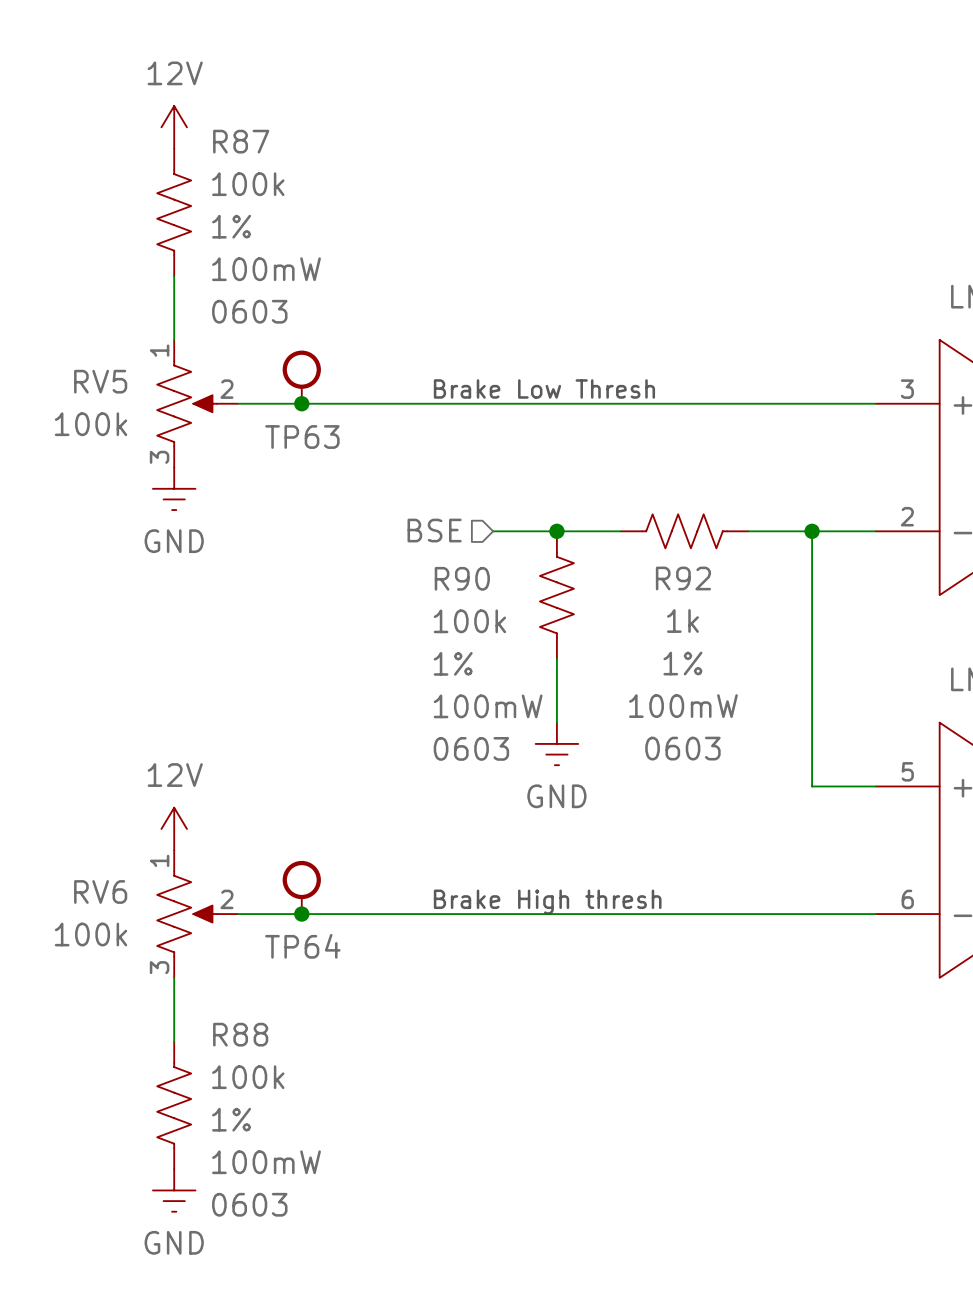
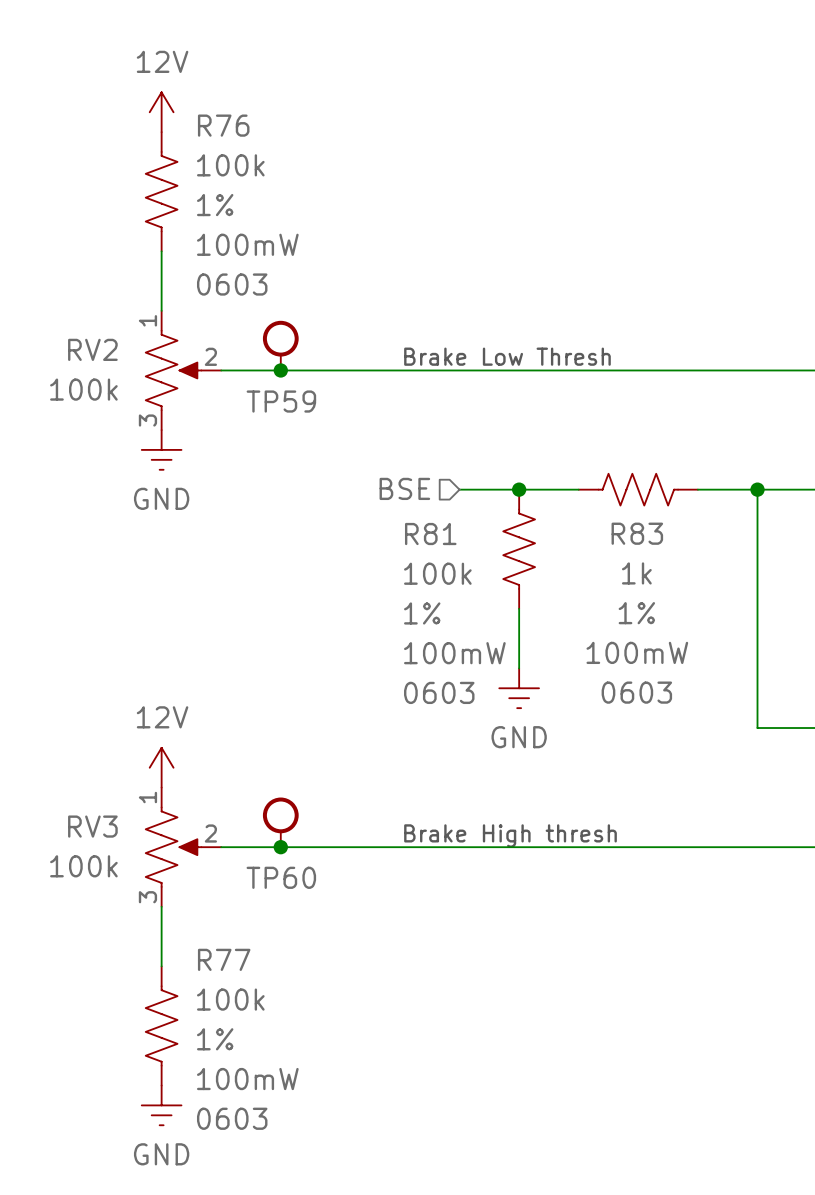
R87 name: R87 (241, 141) -> R76 (223, 125)
RV5 name: RV5 (100, 381) -> RV2 (92, 349)
TP63 name: TP63 (302, 437) -> TP59 (281, 401)
R90 name: R90 (462, 578) -> R81 (430, 534)
R92 name: R92 (683, 578) -> R83 (637, 533)
RV6 name: RV6 (100, 891) -> RV3 (92, 826)
TP64 name: TP64 (302, 946) -> TP60 (281, 877)
R88 name: R88 (240, 1034) -> R77 (224, 959)

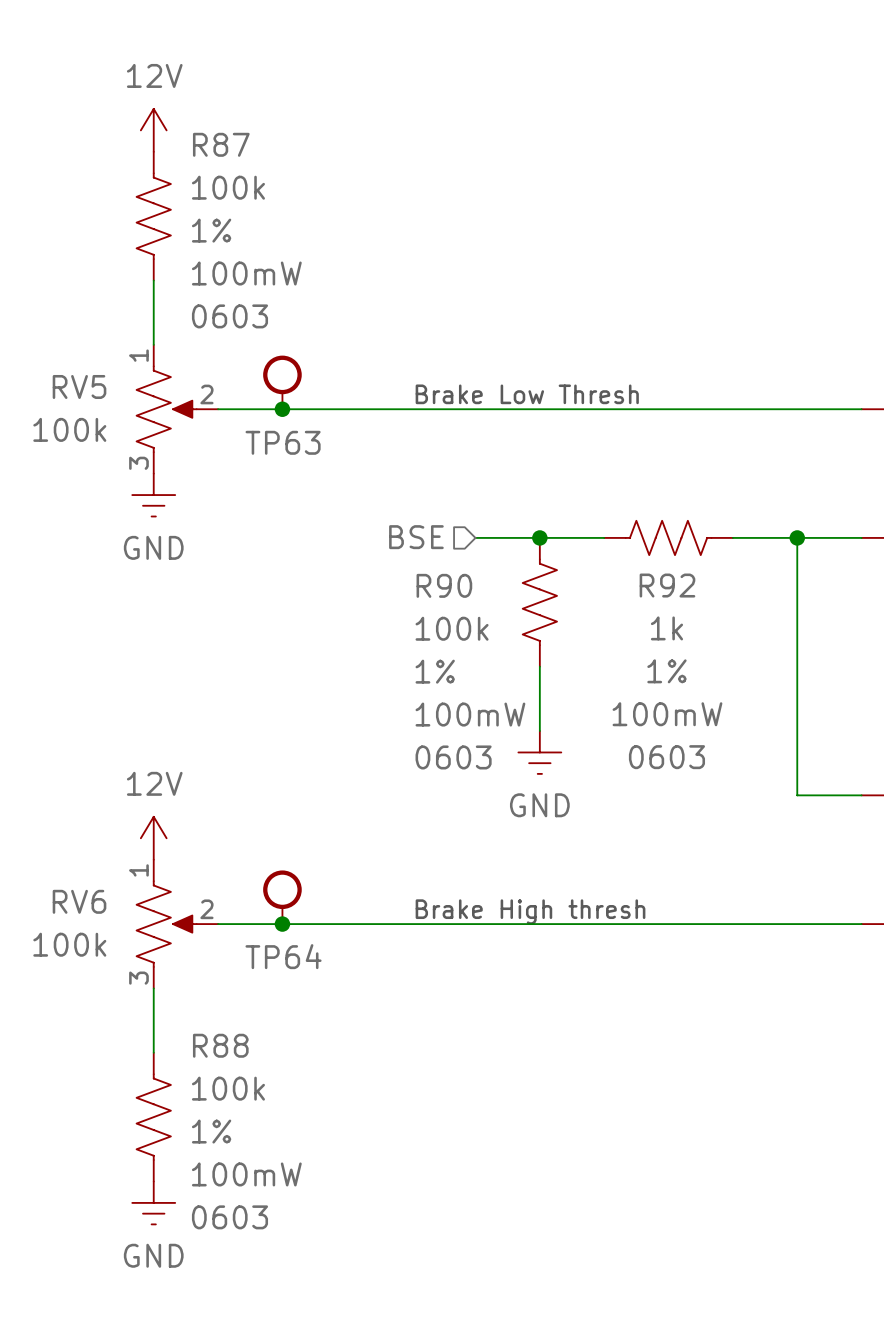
R76 name: R76 (223, 125) -> R87 (221, 144)
RV2 name: RV2 (92, 349) -> RV5 (79, 386)
TP59 name: TP59 (281, 401) -> TP63 (283, 442)
R83 name: R83 (637, 533) -> R92 (667, 585)
R81 name: R81 (430, 534) -> R90 (444, 585)
RV3 name: RV3 (92, 826) -> RV6 (79, 901)
TP60 name: TP60 (281, 877) -> TP64 (283, 956)
R77 name: R77 (224, 959) -> R88 (220, 1045)

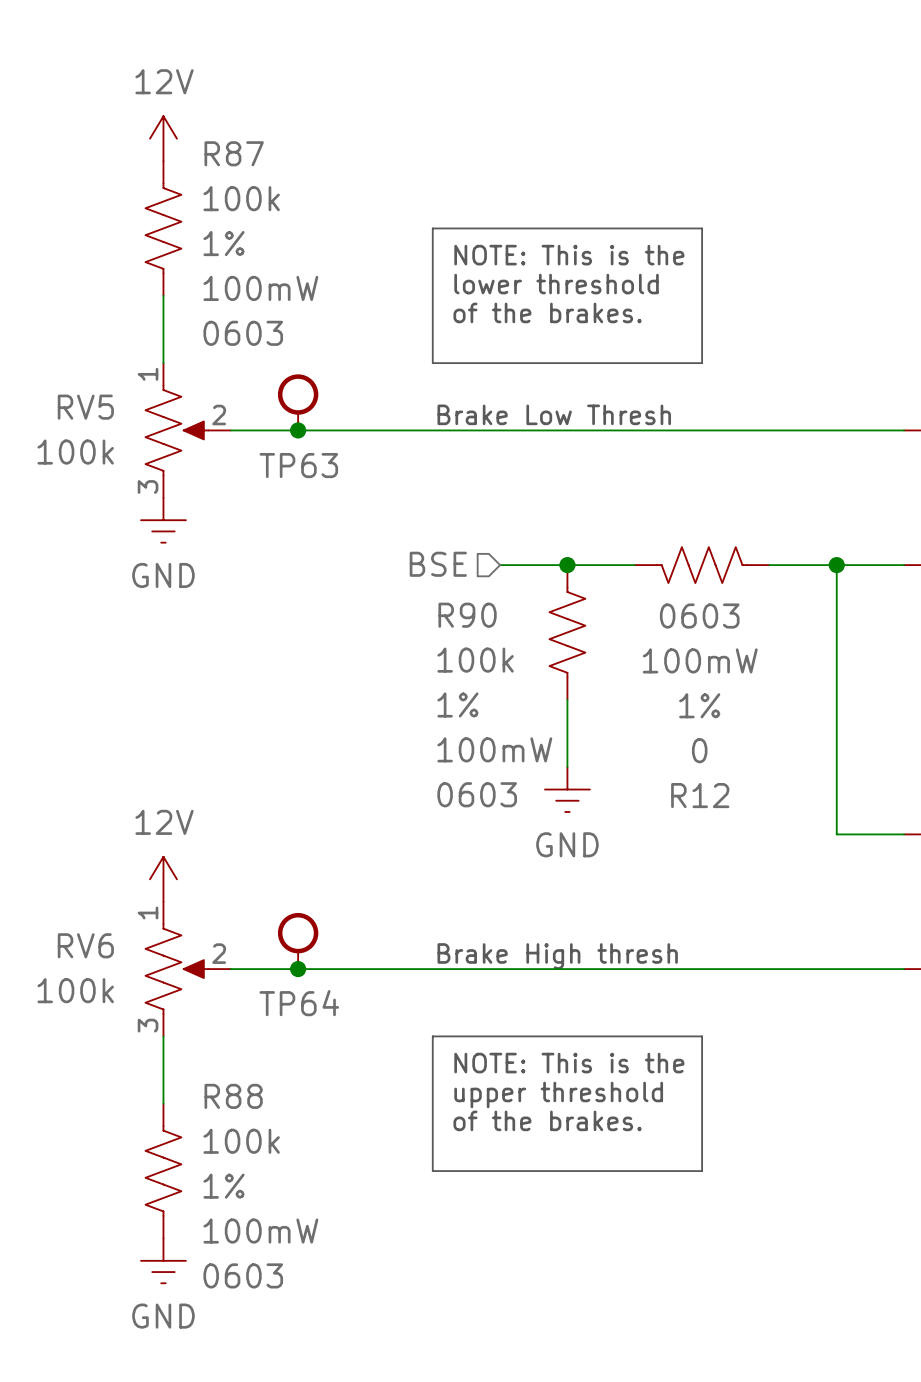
line: none -> (432, 228) (702, 228) (702, 363) (432, 363) (432, 228)
text: none -> NOTE: This is the (569, 255)
text: none -> lower threshold (556, 284)
text: none -> of the brakes. (547, 312)
R92: 1k (668, 537) -> none
R12: none -> 0 (702, 565)
line: none -> (432, 1036) (432, 1171) (702, 1171) (702, 1036) (432, 1036)
text: none -> NOTE: This is the (569, 1063)
text: none -> upper threshold (558, 1094)
text: none -> of the brakes. (547, 1120)

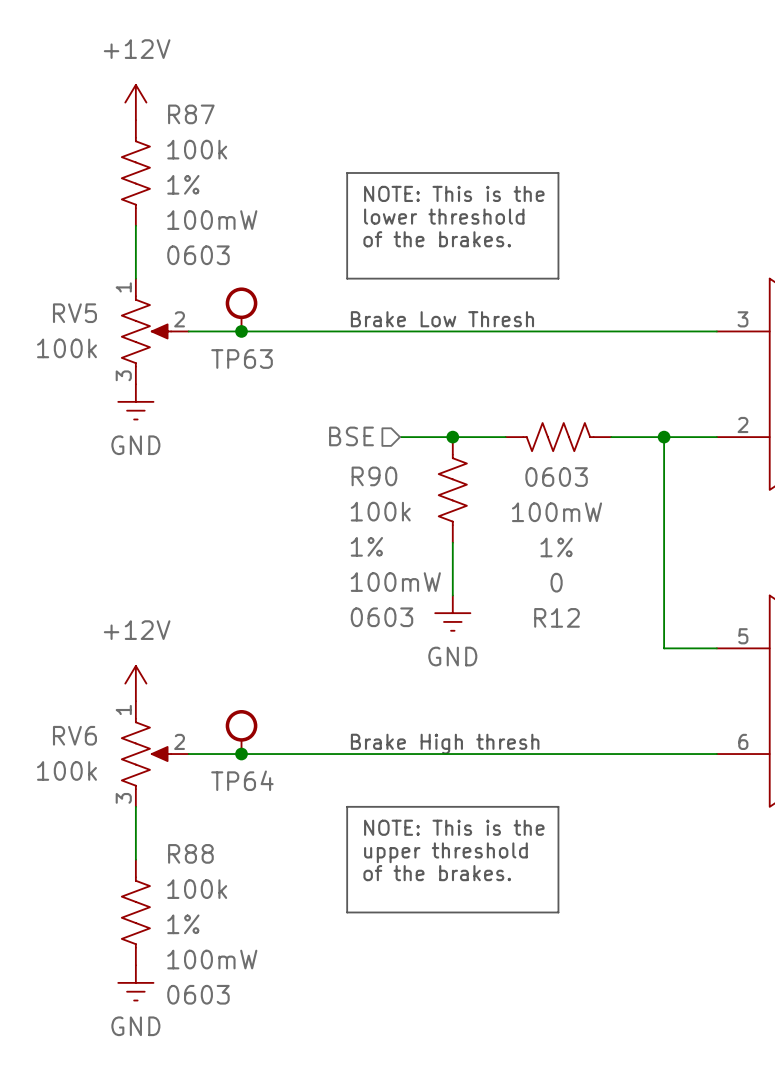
power symbol: 12V (163, 138) -> +12V (135, 102)
power symbol: 12V (163, 879) -> +12V (135, 683)

